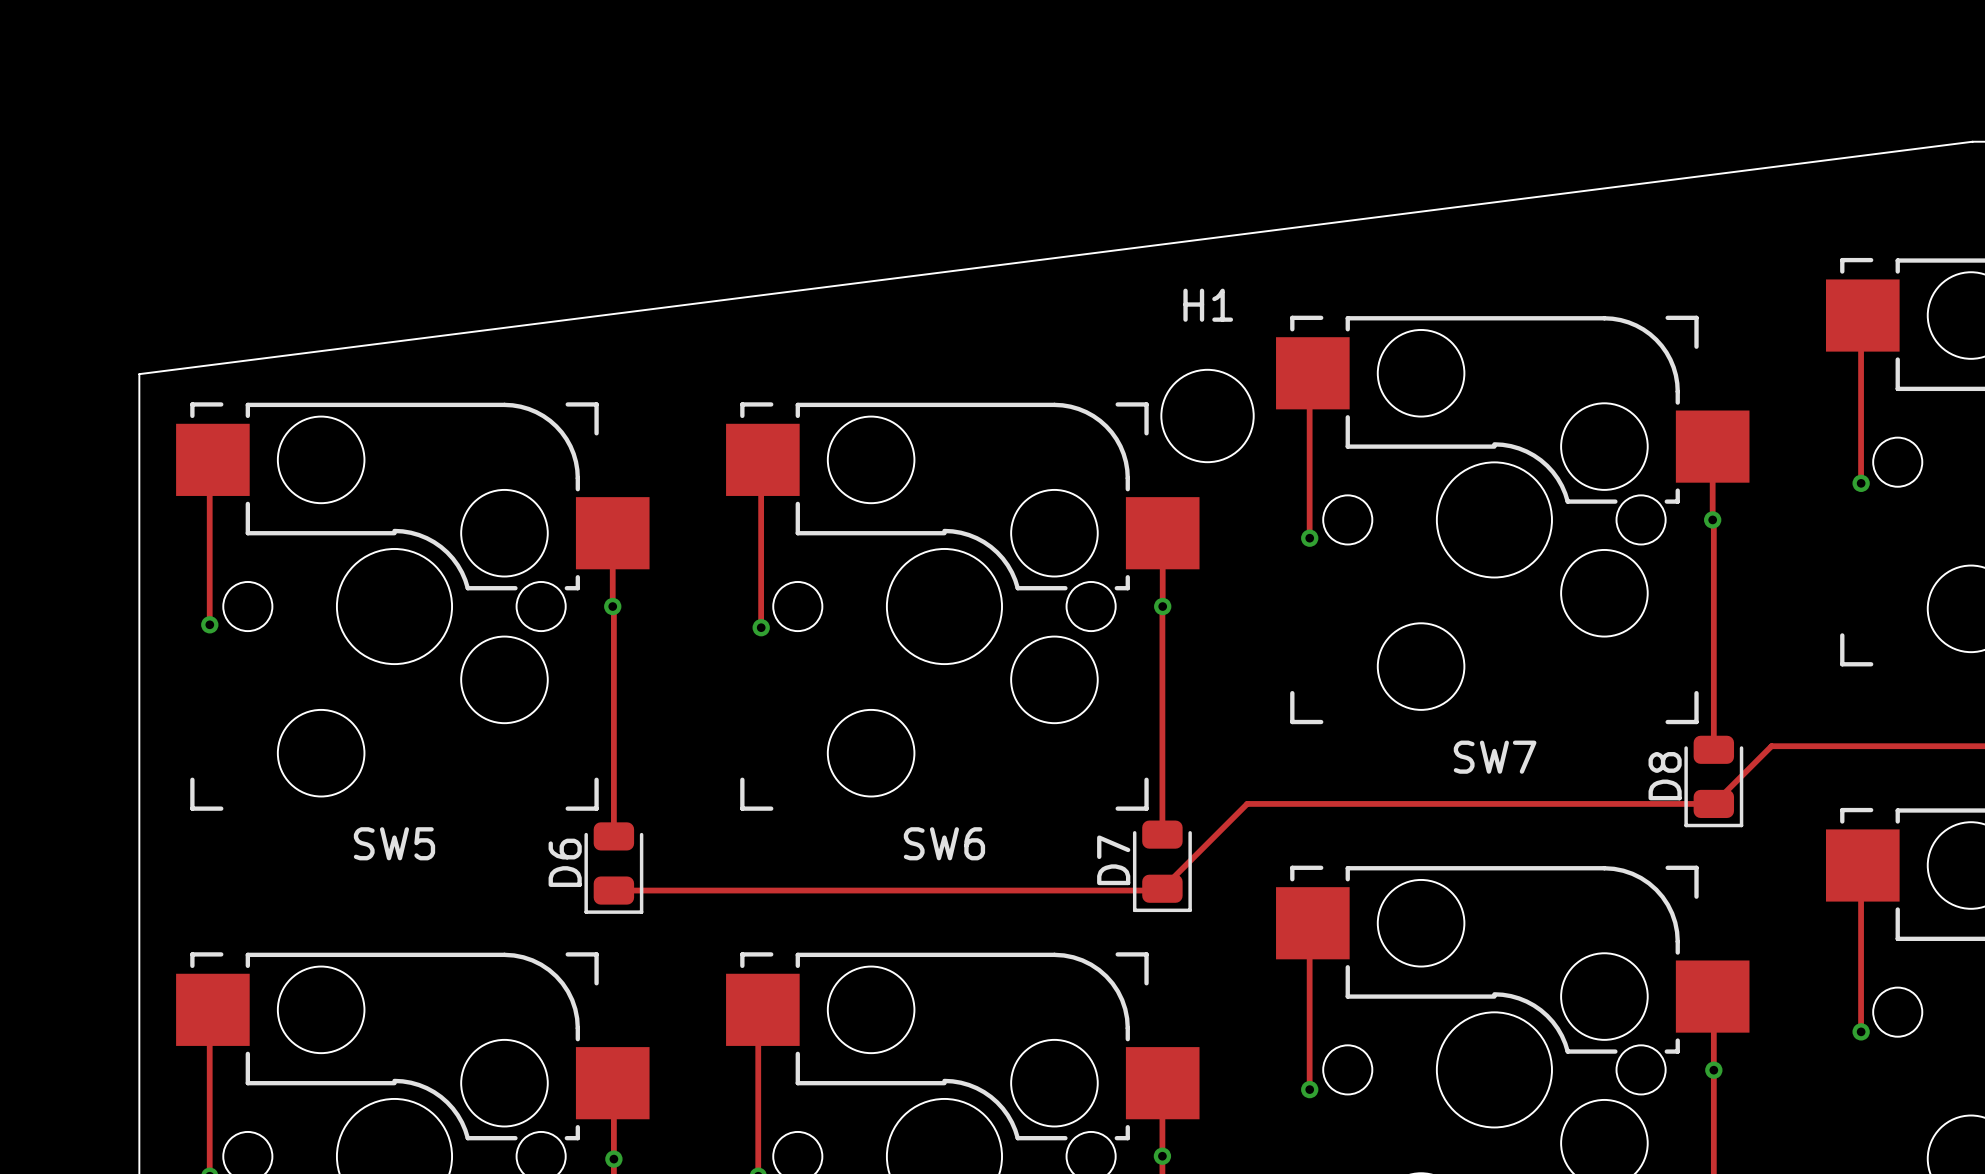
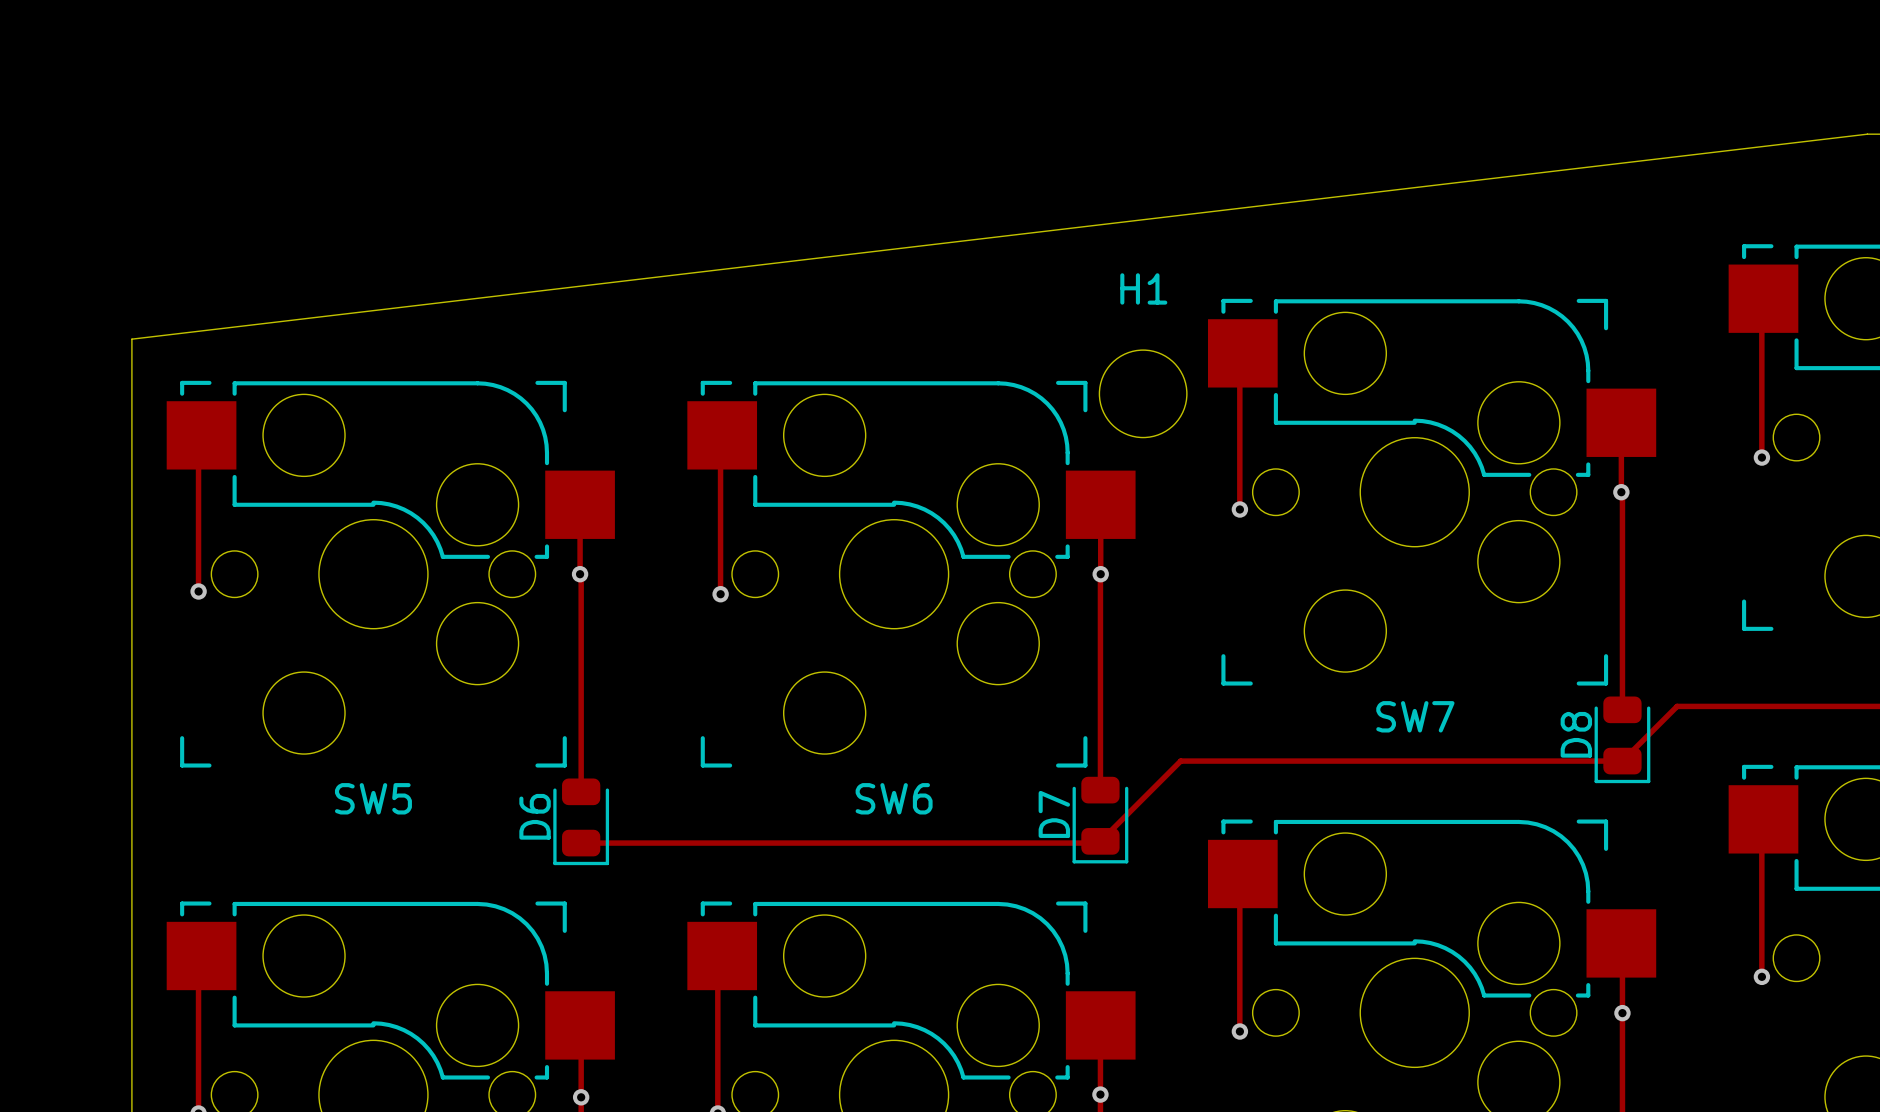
board edge: (1972, 141) (139, 374) -> (1867, 134) (131, 339) (131, 354)

